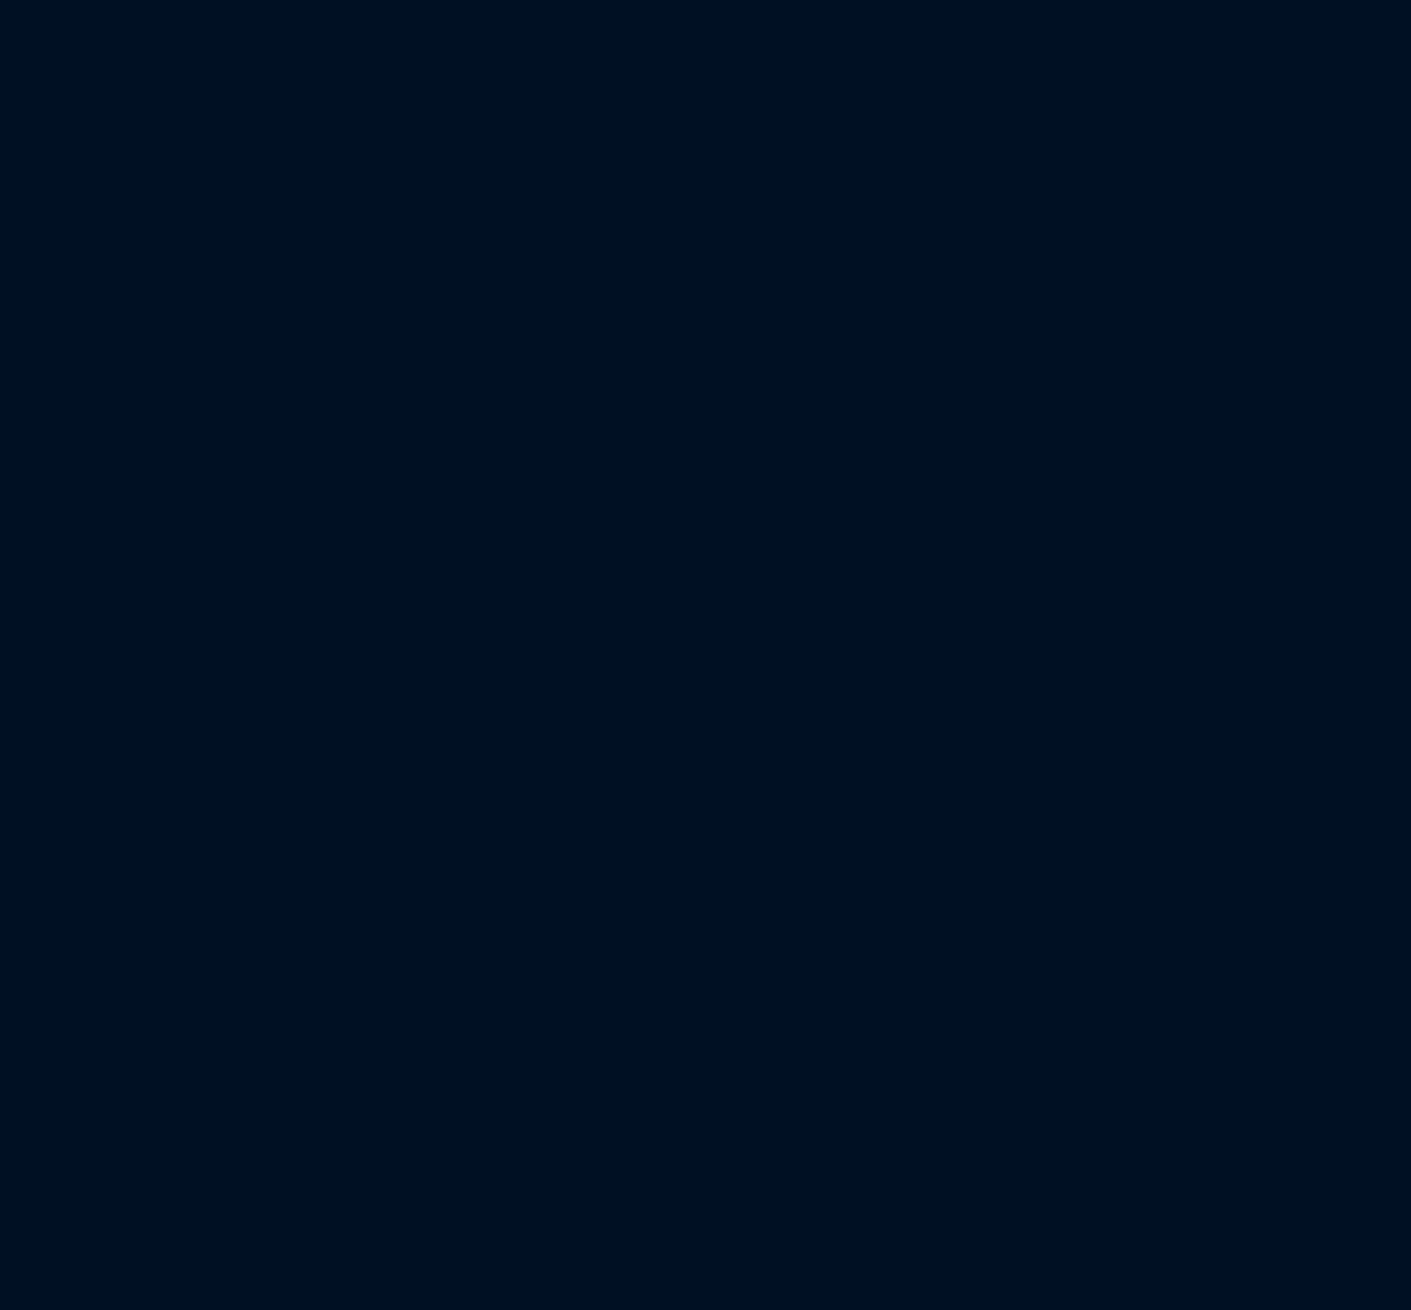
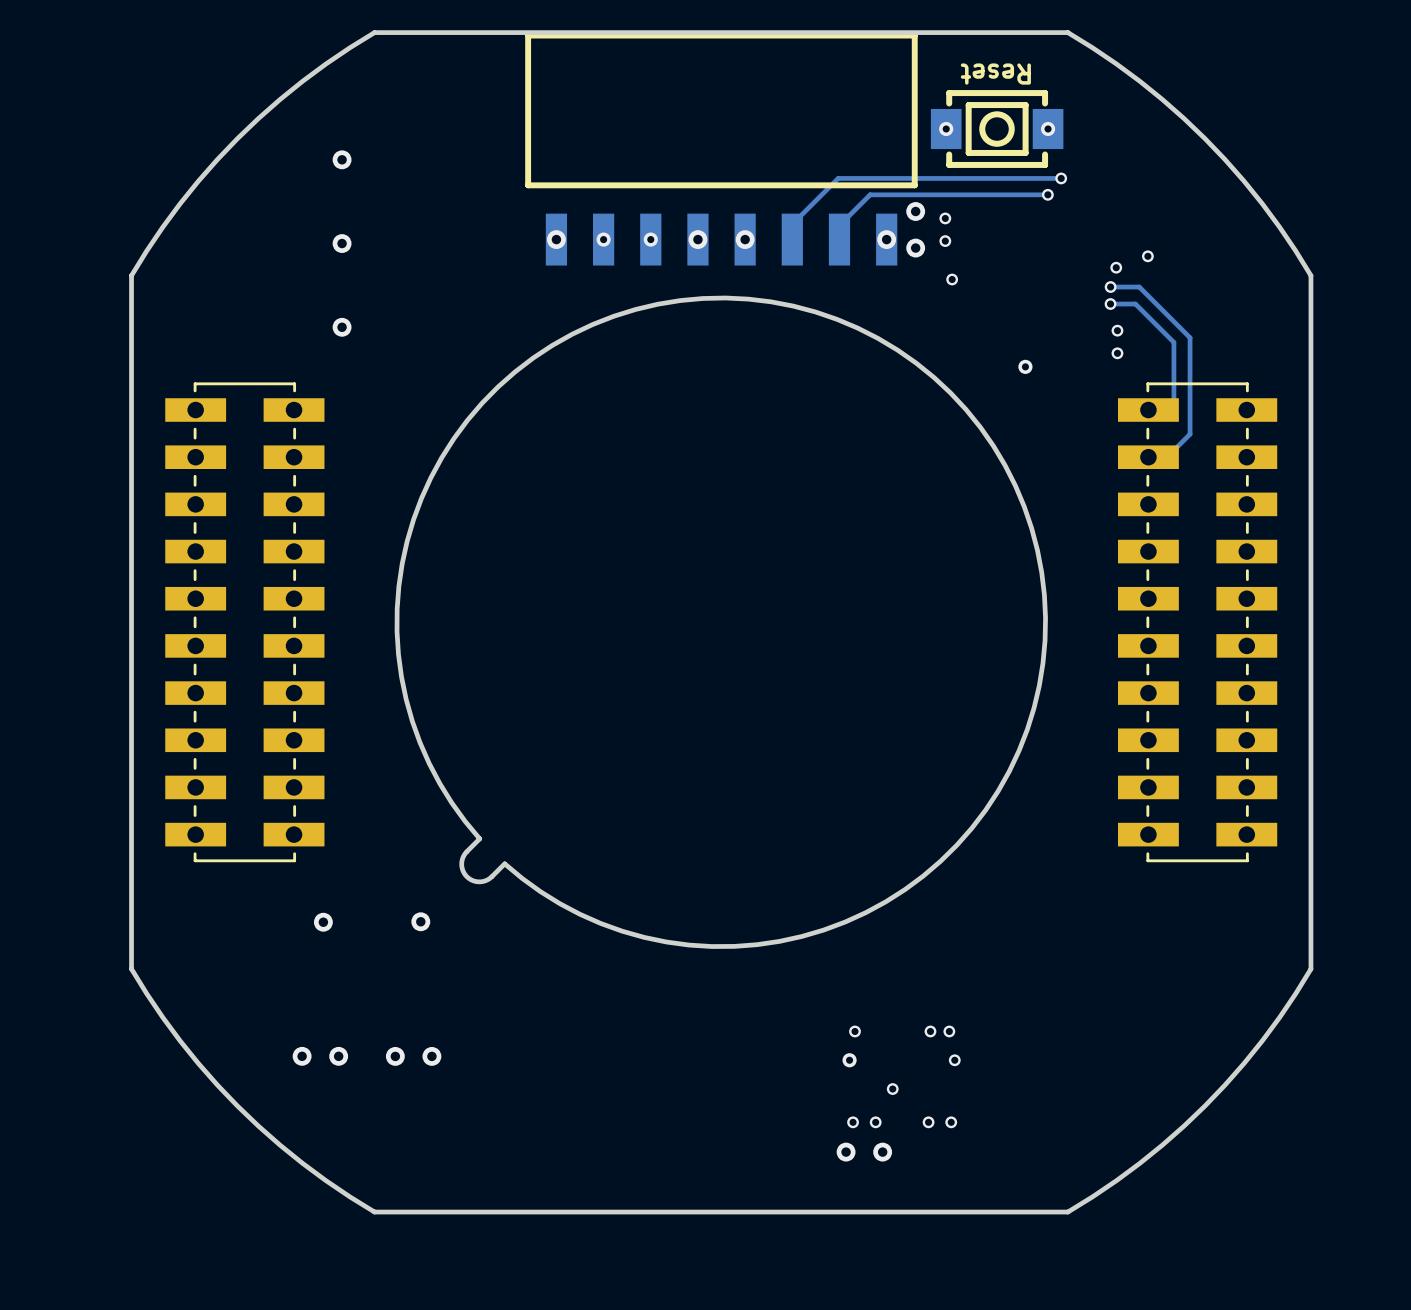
board edge: none -> (1067, 32) (1139, 81) (1204, 138) (1262, 203) (1310, 275) (1310, 969) (1262, 1040) (1204, 1106) (1139, 1163) (1067, 1212) (374, 1212) (302, 1163) (237, 1106) (180, 1040) (131, 969) (131, 275) (180, 203) (237, 138) (302, 81) (374, 32)
board edge: none -> (1068, 32) (374, 32)
text: none -> Reset (995, 74)
via: none -> (946, 129)
part: none -> (997, 129)
via: none -> (1048, 129)
part: none -> (721, 149)
via: none -> (342, 159)
track: none -> (1061, 178) (838, 178) (792, 224) (792, 239)
via: none -> (1061, 178)
track: none -> (1047, 194) (870, 194) (839, 225) (839, 239)
via: none -> (1047, 194)
via: none -> (915, 211)
via: none -> (945, 218)
via: none -> (556, 239)
via: none -> (603, 239)
via: none -> (650, 239)
via: none -> (697, 239)
via: none -> (745, 239)
via: none -> (886, 239)
via: none -> (945, 241)
via: none -> (342, 243)
via: none -> (915, 248)
via: none -> (1147, 256)
via: none -> (1116, 267)
via: none -> (952, 279)
track: none -> (1110, 287) (1139, 287) (1190, 337) (1190, 434) (1167, 457) (1148, 457)
via: none -> (1110, 287)
track: none -> (1110, 304) (1135, 304) (1173, 342) (1173, 410) (1148, 410)
via: none -> (1110, 304)
via: none -> (342, 327)
via: none -> (1117, 330)
via: none -> (1117, 353)
via: none -> (1025, 366)
part: none -> (244, 622)
part: none -> (1197, 622)
board edge: none -> (479, 838) (465, 853) (461, 860) (464, 873) (472, 880) (480, 881) (486, 880) (504, 863) (540, 891) (559, 903) (600, 923) (644, 937) (666, 942) (711, 946) (757, 944) (801, 936) (823, 930) (865, 912) (885, 901) (923, 876) (940, 861) (971, 828) (985, 810) (1009, 771) (1027, 729) (1034, 707) (1039, 685) (1045, 640) (1045, 617) (1041, 572) (1031, 528) (1015, 485) (1005, 465) (993, 445) (966, 409) (950, 392) (916, 363) (897, 350) (857, 328) (836, 319) (793, 306) (748, 299) (702, 298) (680, 300) (657, 304) (613, 316) (572, 334) (552, 345) (533, 357) (498, 386) (482, 403) (453, 438) (430, 477) (421, 498) (407, 541) (398, 586) (397, 609) (397, 631) (401, 677) (406, 699) (420, 742) (439, 783) (451, 802) (479, 838)
via: none -> (420, 921)
via: none -> (323, 922)
via: none -> (854, 1031)
via: none -> (930, 1031)
via: none -> (949, 1031)
via: none -> (302, 1056)
via: none -> (338, 1056)
via: none -> (395, 1056)
via: none -> (431, 1056)
via: none -> (849, 1060)
via: none -> (954, 1060)
via: none -> (892, 1089)
via: none -> (853, 1122)
via: none -> (875, 1122)
via: none -> (928, 1122)
via: none -> (951, 1122)
via: none -> (846, 1152)
via: none -> (882, 1152)

